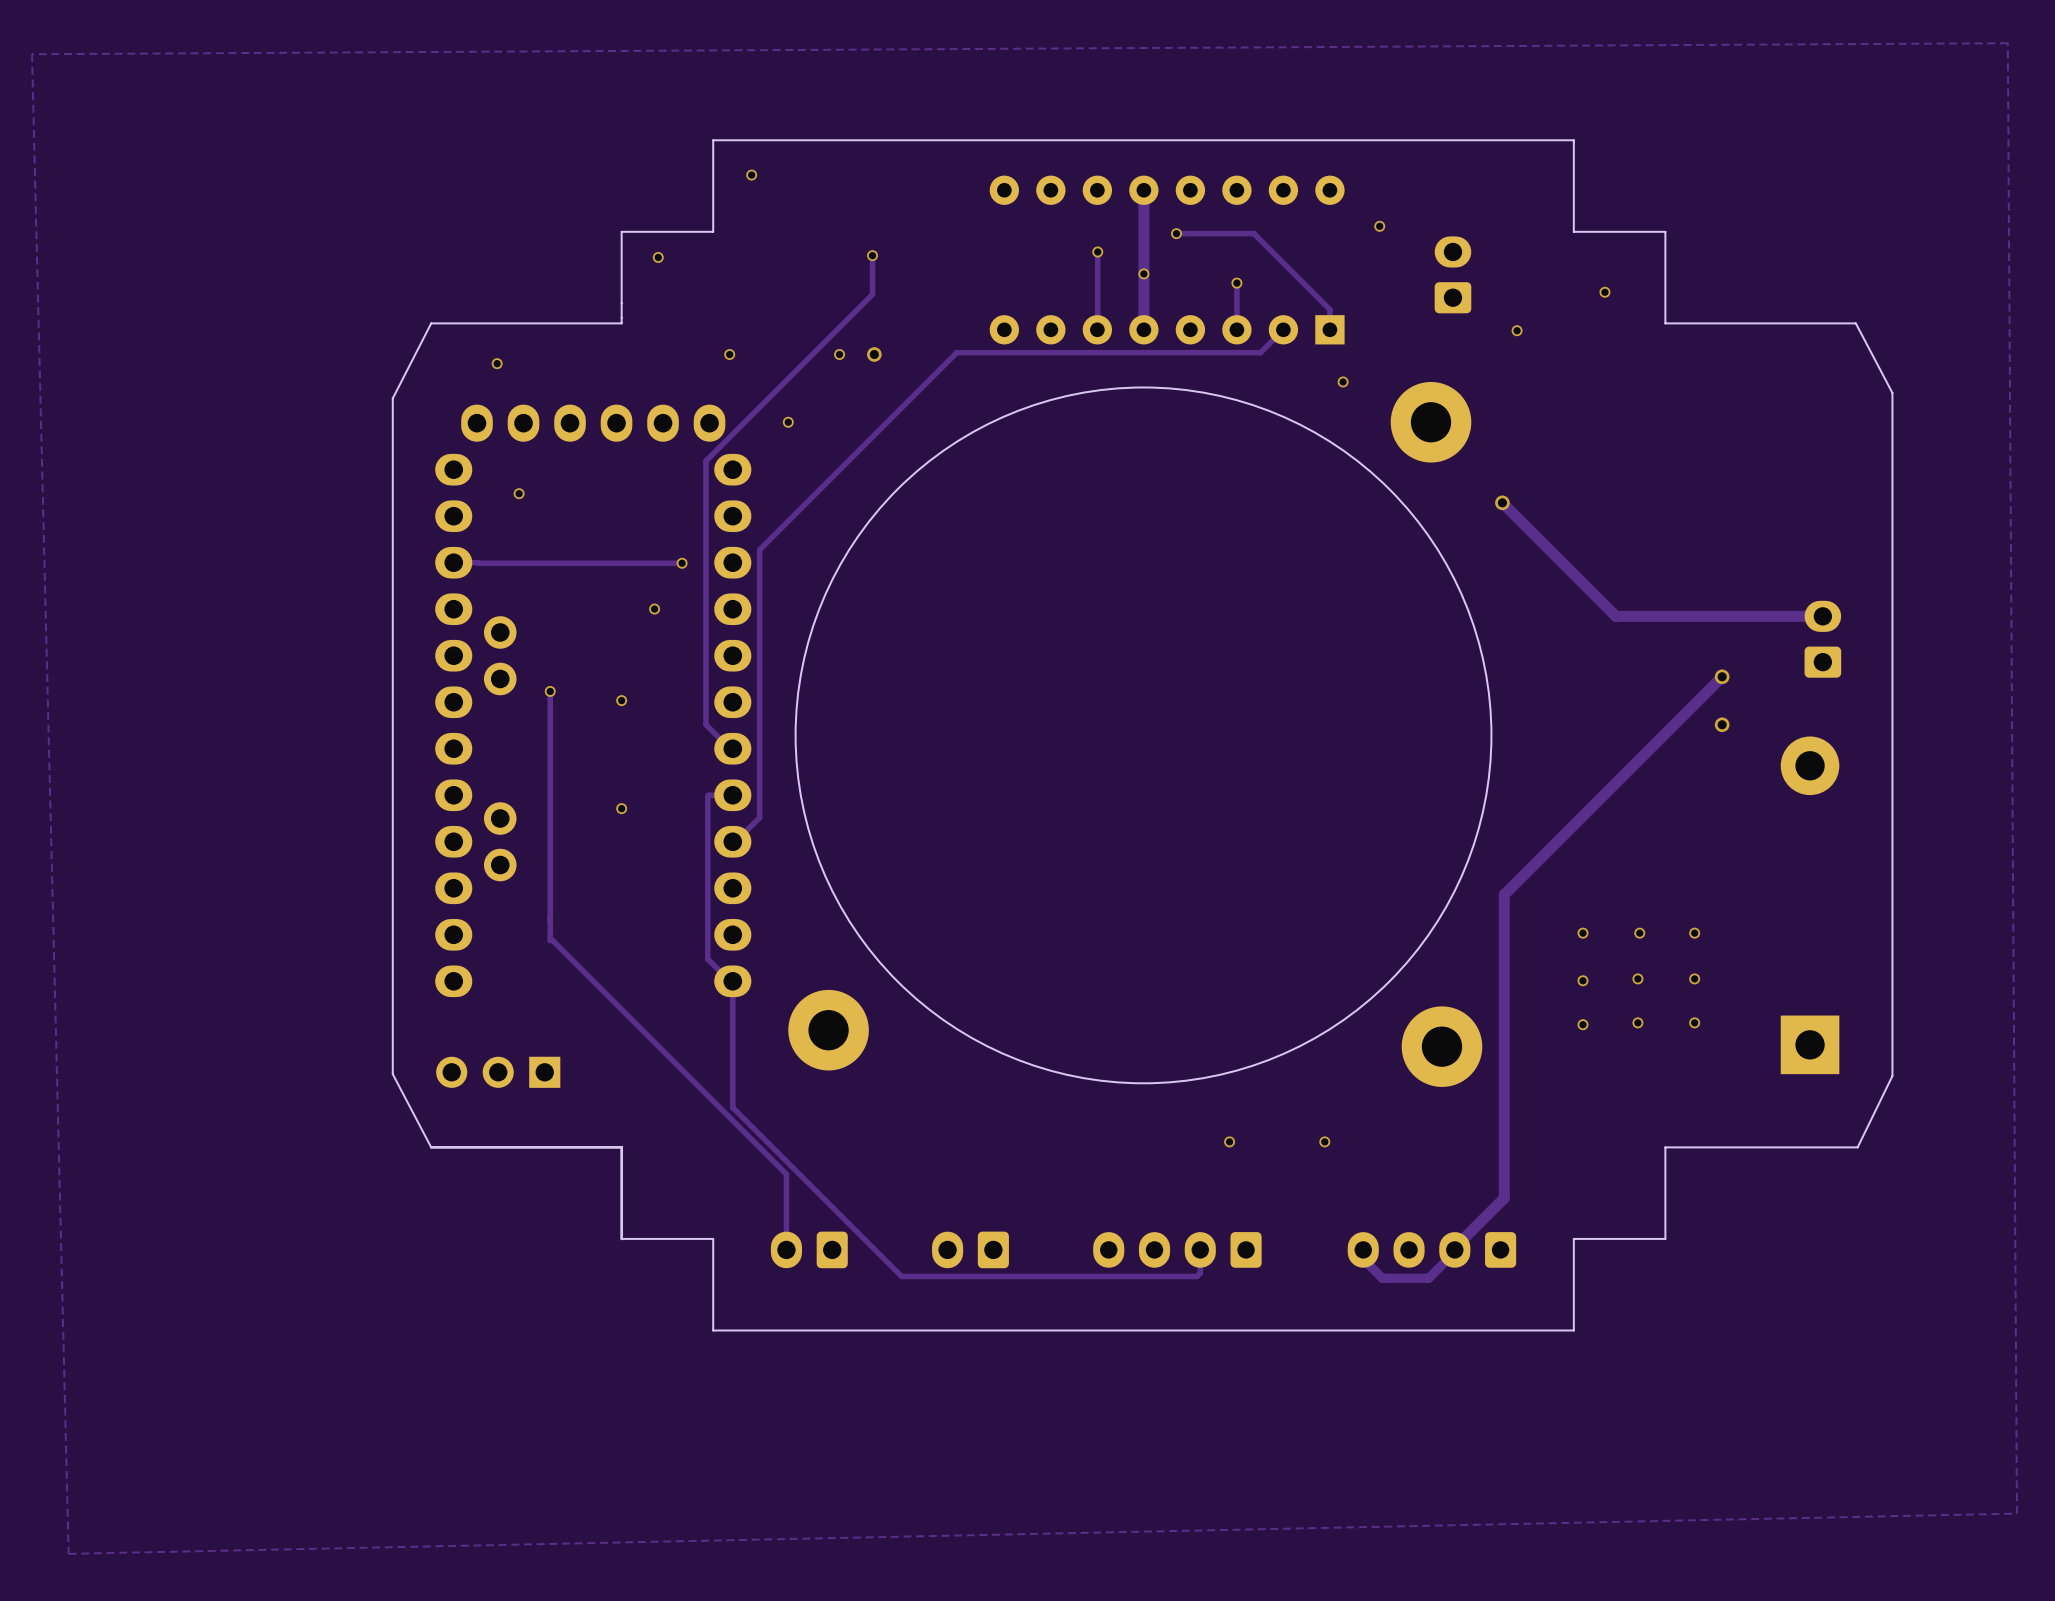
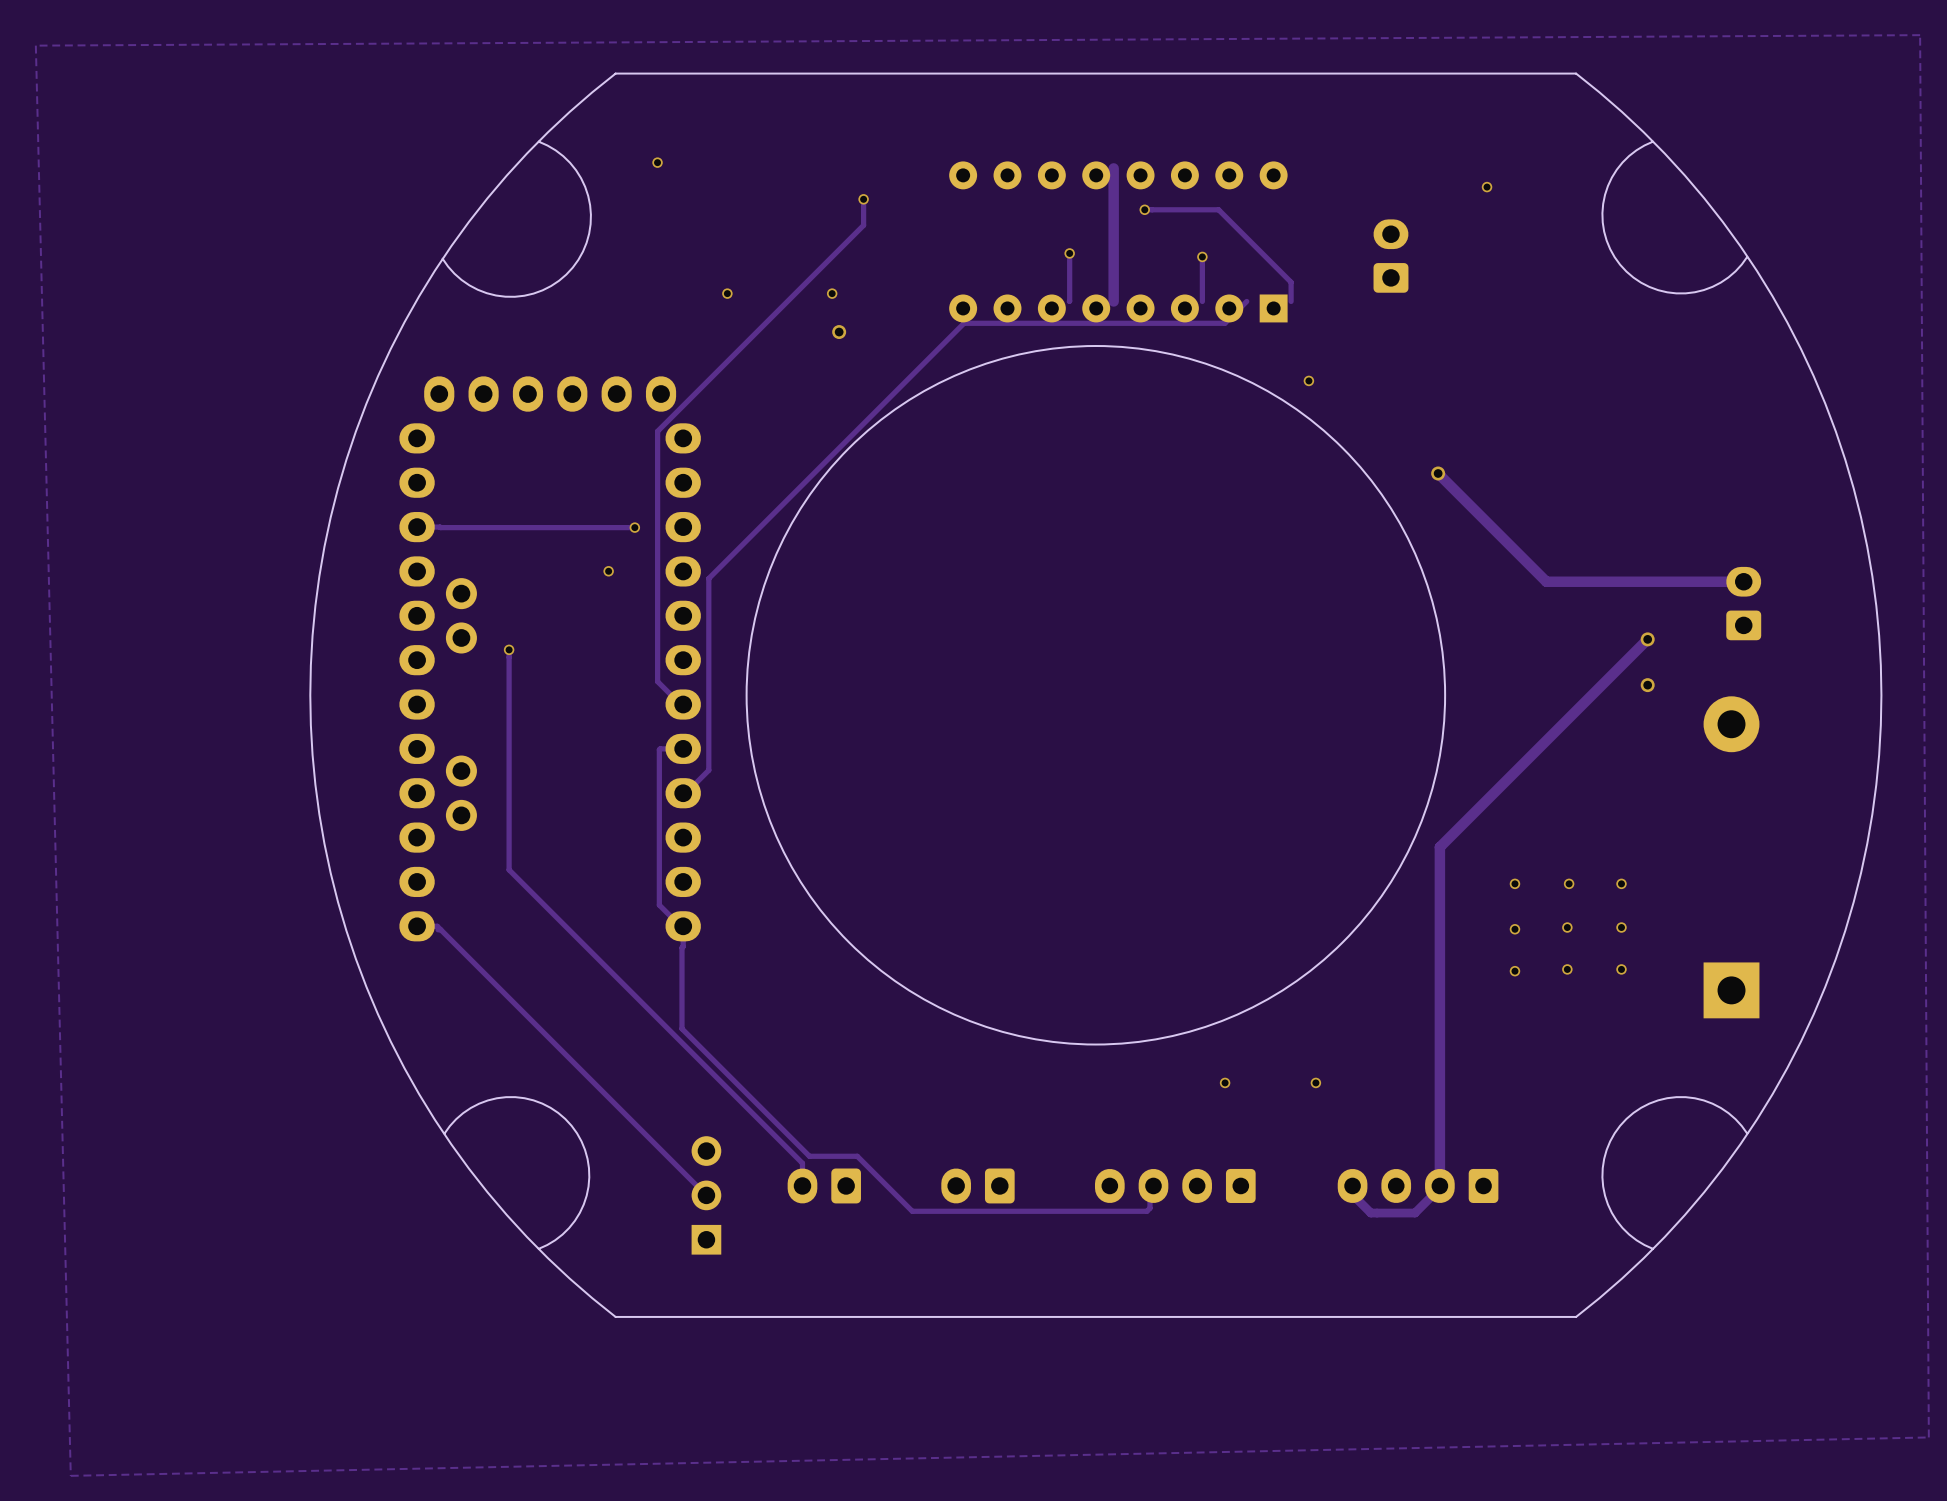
board edge: (1573, 140) (1573, 231) (1665, 231) (1665, 323) (1855, 323) (1892, 392) (1892, 1075) (1857, 1147) (1665, 1147) (1665, 1238) (1573, 1238) (1573, 1330) (713, 1330) (713, 1238) (621, 1238) (621, 1147) (431, 1147) (392, 1074) (392, 398) (431, 323) (621, 323) (621, 231) (713, 231) (713, 140) (1573, 140) -> (1576, 73) (615, 73) (569, 111) (526, 153) (468, 221) (419, 296) (390, 348) (355, 431) (337, 488) (319, 576) (312, 635) (310, 695) (315, 784) (330, 873) (346, 930) (366, 986) (404, 1068) (451, 1144) (506, 1214) (547, 1258) (615, 1316) (1576, 1316) (1621, 1278) (1664, 1236) (1722, 1168) (1772, 1094) (1800, 1041) (1825, 986) (1853, 902) (1872, 814) (1879, 754) (1881, 695) (1876, 605) (1861, 517) (1845, 459) (1825, 403) (1787, 322) (1740, 246) (1684, 175) (1621, 111) (1576, 73)
board edge: none -> (538, 141) (555, 150) (570, 162) (581, 178) (588, 195) (590, 214) (589, 233) (582, 251) (572, 267) (559, 280) (542, 290) (524, 295) (505, 296) (486, 293) (469, 285) (454, 273) (442, 258)
board edge: none -> (1652, 141) (1636, 150) (1622, 162) (1611, 177) (1605, 194) (1602, 213) (1604, 231) (1610, 249) (1620, 264) (1633, 277) (1649, 286) (1667, 292) (1685, 293) (1703, 290) (1720, 282) (1735, 271) (1747, 256)
via: (751, 175) -> none
via: none -> (657, 162)
track: (1143, 190) (1143, 329) -> (1113, 168) (1113, 301)
via: none -> (1487, 187)
track: none -> (863, 199) (863, 225) (657, 431) (657, 681) (680, 704) (683, 704)
via: none -> (863, 199)
via: (1379, 226) -> none
track: (1176, 233) (1253, 233) (1329, 309) (1329, 329) -> (1144, 209) (1218, 209) (1291, 282) (1291, 301)
via position: (1176, 233) -> (1144, 209)
track: (1097, 251) (1097, 329) -> none
via: (1097, 251) -> none
track: (872, 255) (872, 294) (705, 460) (705, 724) (730, 748) (732, 748) -> none
via: (872, 255) -> none
via: (658, 257) -> none
track: none -> (1069, 253) (1069, 301)
via: none -> (1069, 253)
via: (1143, 273) -> none
track: (1236, 283) (1236, 329) -> (1202, 256) (1202, 301)
via position: (1236, 283) -> (1202, 256)
via: (1604, 292) -> none
via: none -> (727, 293)
via: none -> (832, 293)
track: none -> (1246, 301) (1224, 323) (964, 323) (708, 578) (708, 770) (685, 793) (683, 793)
track: (1283, 329) (1260, 352) (956, 352) (759, 549) (759, 817) (735, 841) (732, 841) -> none
via: (1517, 330) -> none
via: (729, 354) -> none
via: (839, 354) -> none
via: (497, 363) -> none
via position: (1343, 381) -> (1308, 380)
round board edge size: [794, 386, 1493, 1085] -> [745, 345, 1446, 1046]
via: (788, 422) -> none
part: (1431, 422) -> none
part position: (593, 423) -> (550, 394)
via: (519, 493) -> none
track: (453, 562) (682, 563) -> (417, 527) (634, 527)
via position: (682, 563) -> (634, 527)
via position: (654, 609) -> (608, 571)
part position: (500, 655) -> (461, 615)
track: none -> (509, 649) (509, 869) (802, 1163) (802, 1185)
track: (550, 691) (550, 940) (552, 940) (786, 1174) (786, 1249) -> none
via position: (550, 691) -> (509, 649)
via: (621, 700) -> none
part position: (453, 725) -> (417, 682)
part position: (732, 725) -> (683, 682)
track: (732, 795) (707, 796) (707, 959) (730, 981) (732, 981) (732, 1107) (901, 1276) (951, 1276) -> (683, 748) (659, 749) (659, 905) (680, 926) (683, 926) (681, 1028) (809, 1156) (857, 1156) (912, 1211)
via: (621, 808) -> none
part position: (500, 841) -> (461, 793)
track: none -> (417, 926) (437, 926) (706, 1195)
part: (828, 1030) -> none
part: (1441, 1046) -> none
part rotation: 0° (498, 1072) -> 90° clockwise (706, 1195)
part position: (498, 1072) -> (706, 1195)
via: (1229, 1141) -> none
via: none -> (1225, 1082)
via: (1324, 1141) -> none
via: none -> (1315, 1082)
board edge: none -> (444, 1133) (456, 1119) (470, 1107) (487, 1100) (506, 1097) (524, 1098) (542, 1103) (558, 1112) (571, 1125) (581, 1141) (587, 1158) (589, 1177) (586, 1195) (579, 1212) (569, 1228) (555, 1240) (538, 1248)
board edge: none -> (1747, 1133) (1735, 1119) (1720, 1107) (1703, 1100) (1685, 1097) (1667, 1098) (1649, 1103) (1633, 1112) (1620, 1125) (1610, 1141) (1604, 1158) (1602, 1177) (1605, 1195) (1611, 1212) (1622, 1228) (1636, 1240) (1652, 1248)
track: (1504, 1198) (1454, 1247) (1454, 1252) (1428, 1278) (1382, 1278) (1363, 1259) (1363, 1249) -> (1439, 1136) (1439, 1188) (1415, 1213) (1370, 1213) (1352, 1194) (1352, 1185)
part position: (809, 1249) -> (824, 1185)
part position: (970, 1249) -> (977, 1185)
part position: (1177, 1249) -> (1175, 1185)
part position: (1431, 1249) -> (1418, 1185)

